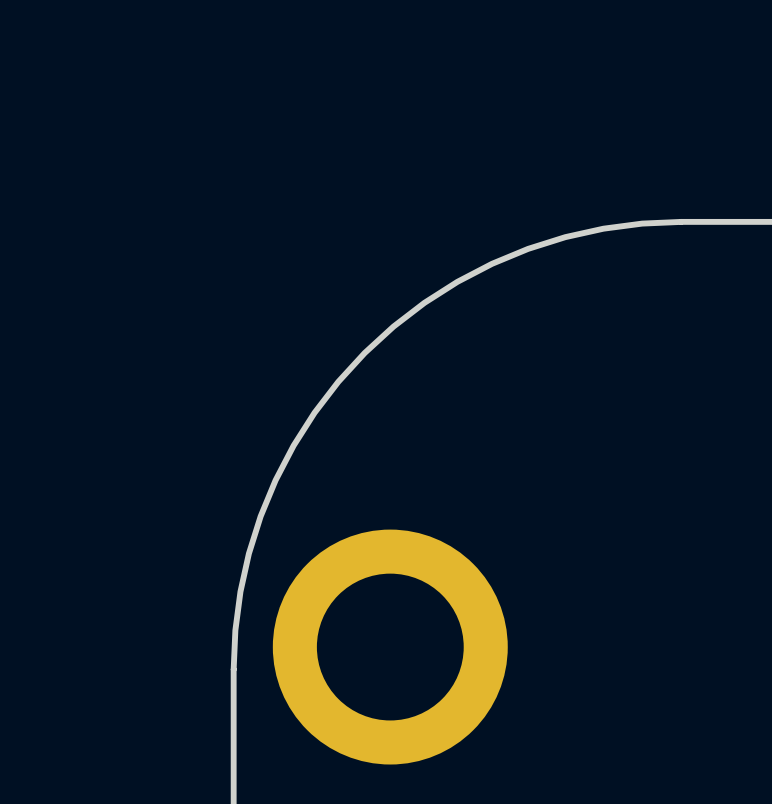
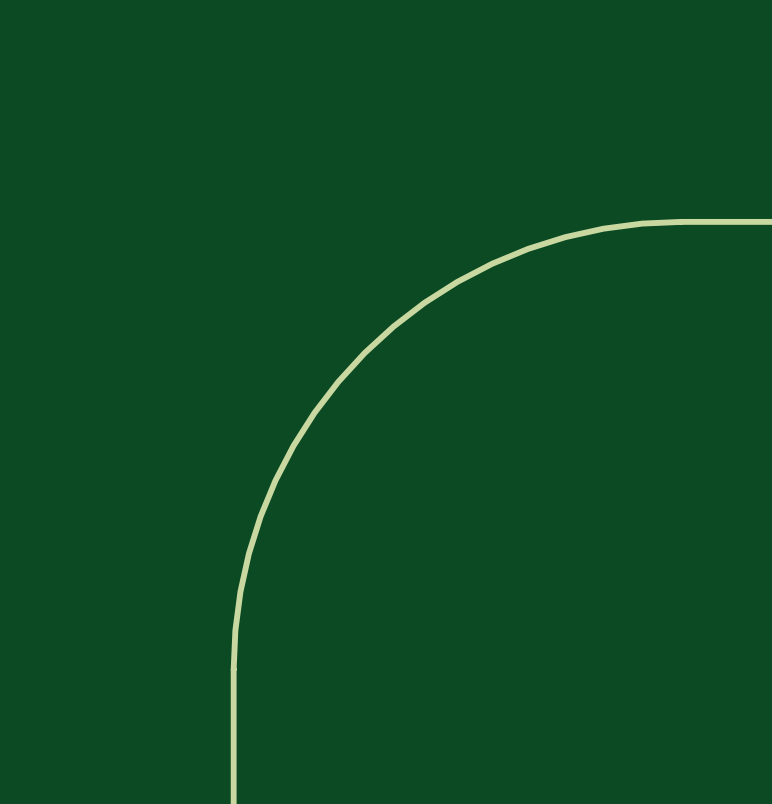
part: (390, 647) -> none

